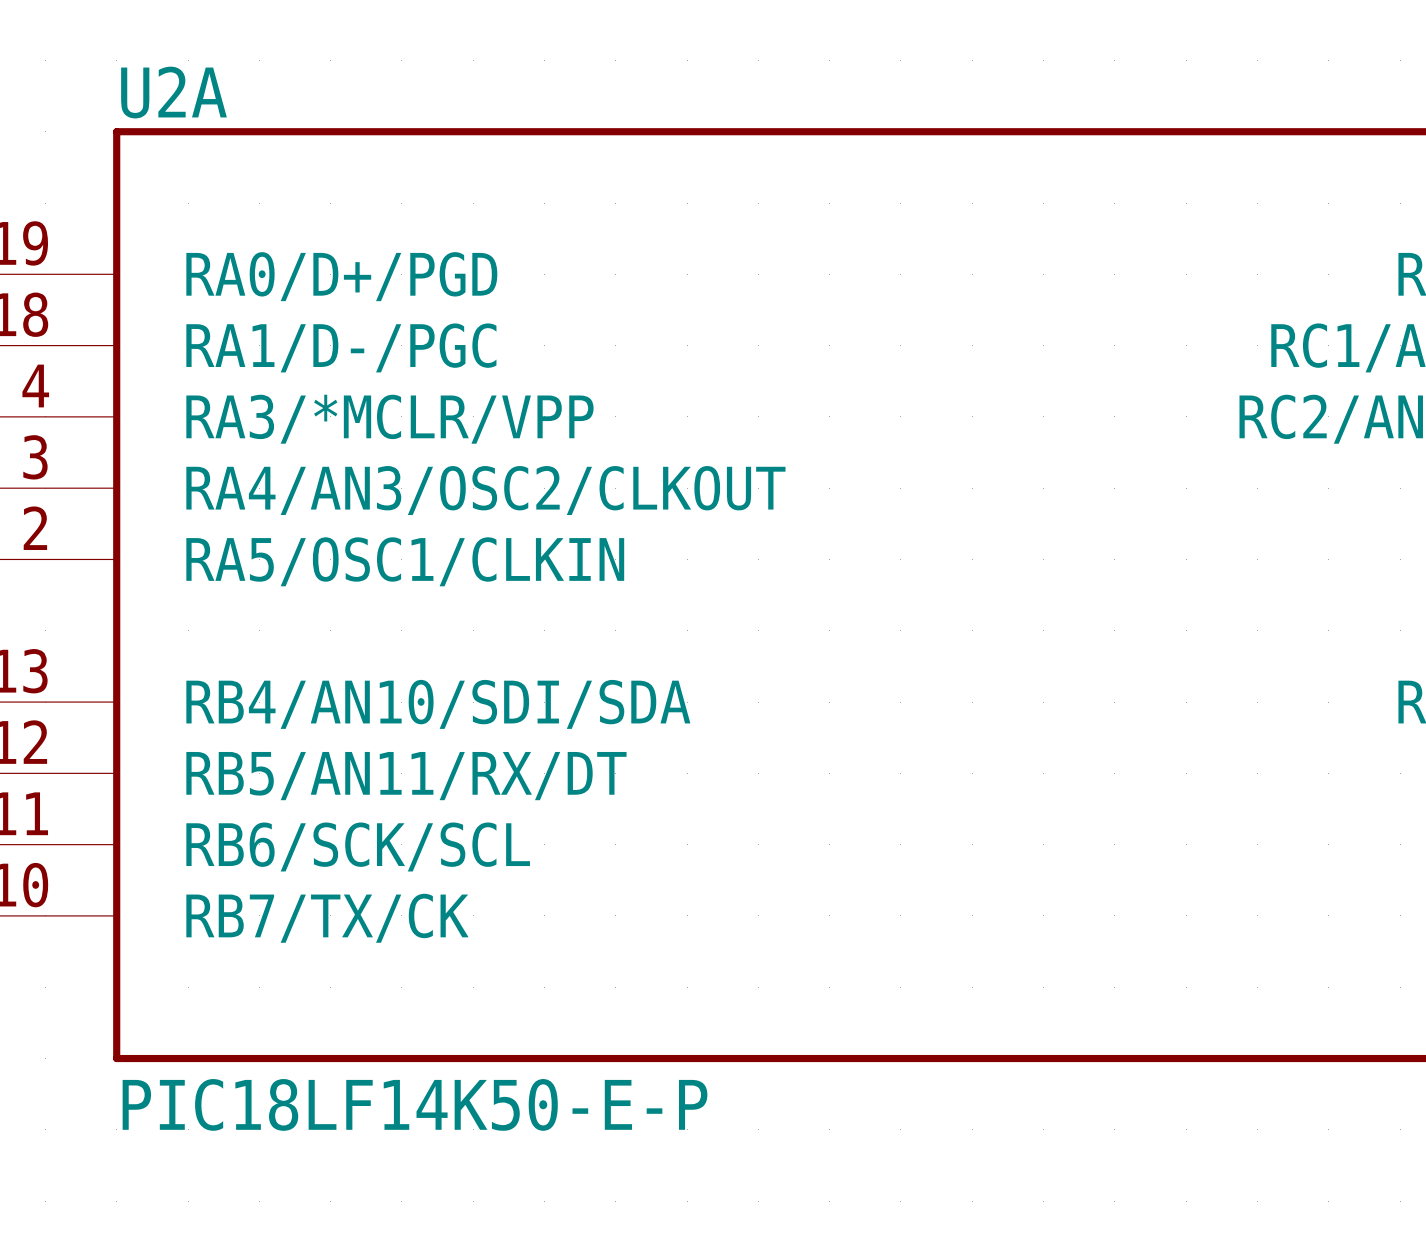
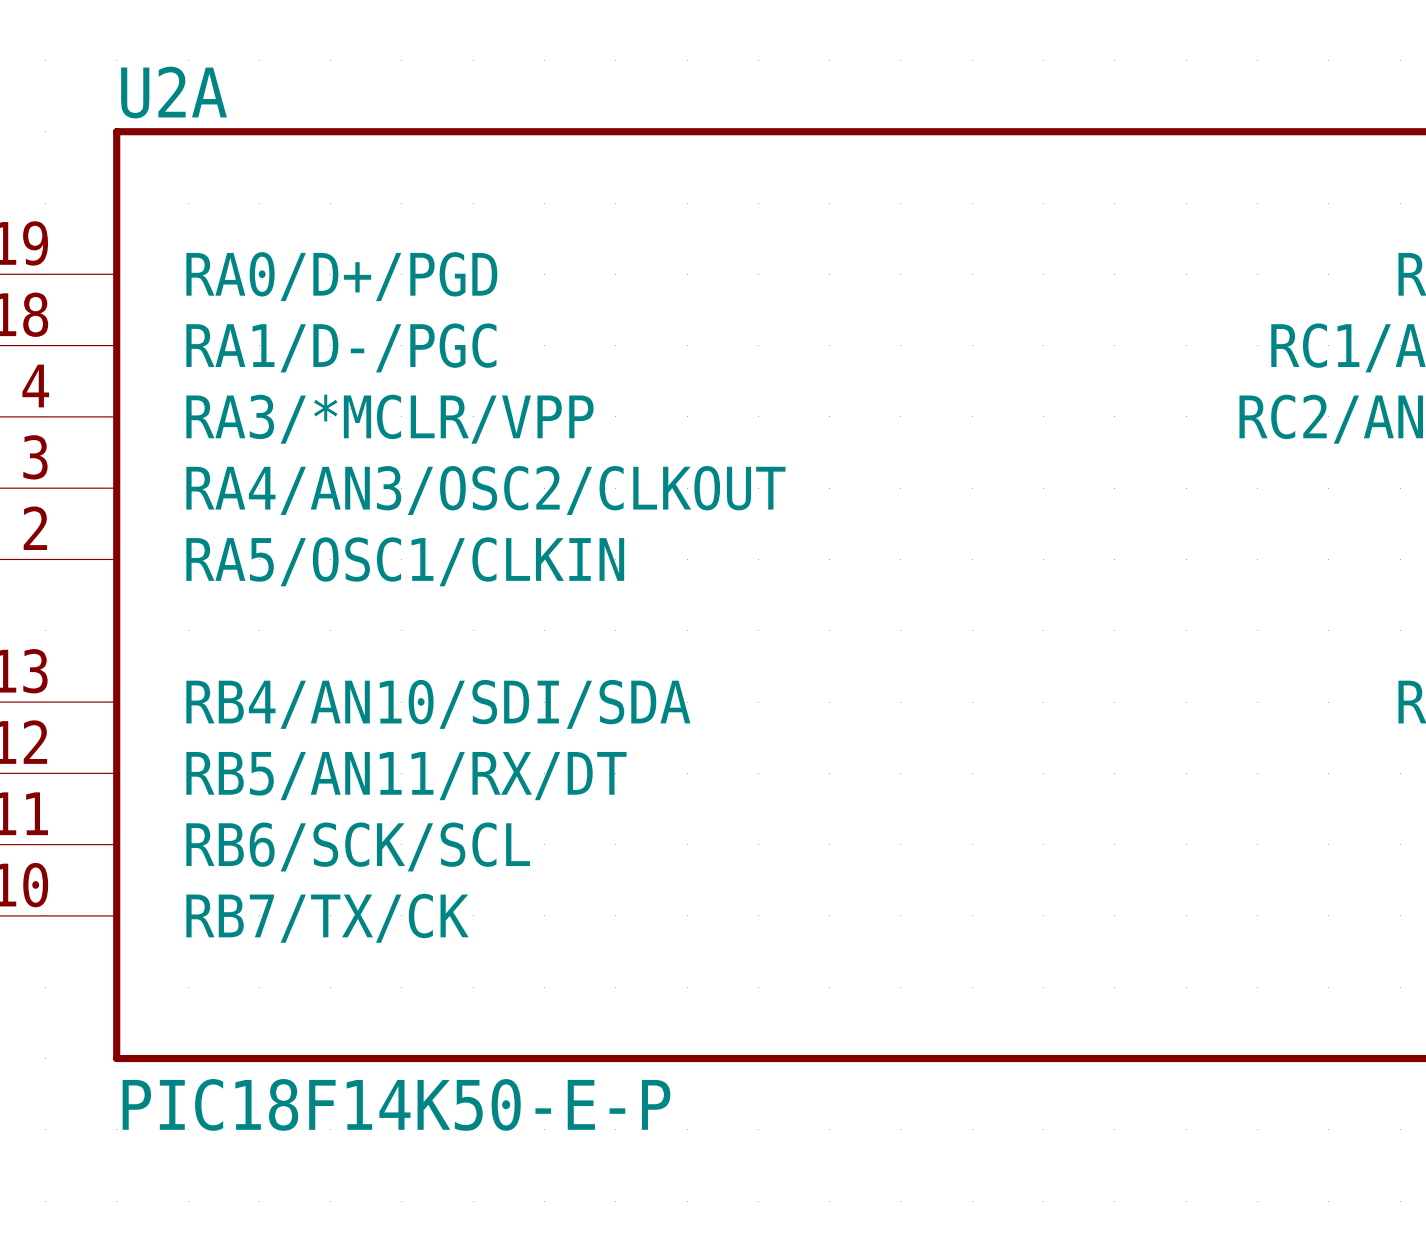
U2A value: PIC18LF14K50-E-P (415, 1104) -> PIC18F14K50-E-P (396, 1104)

